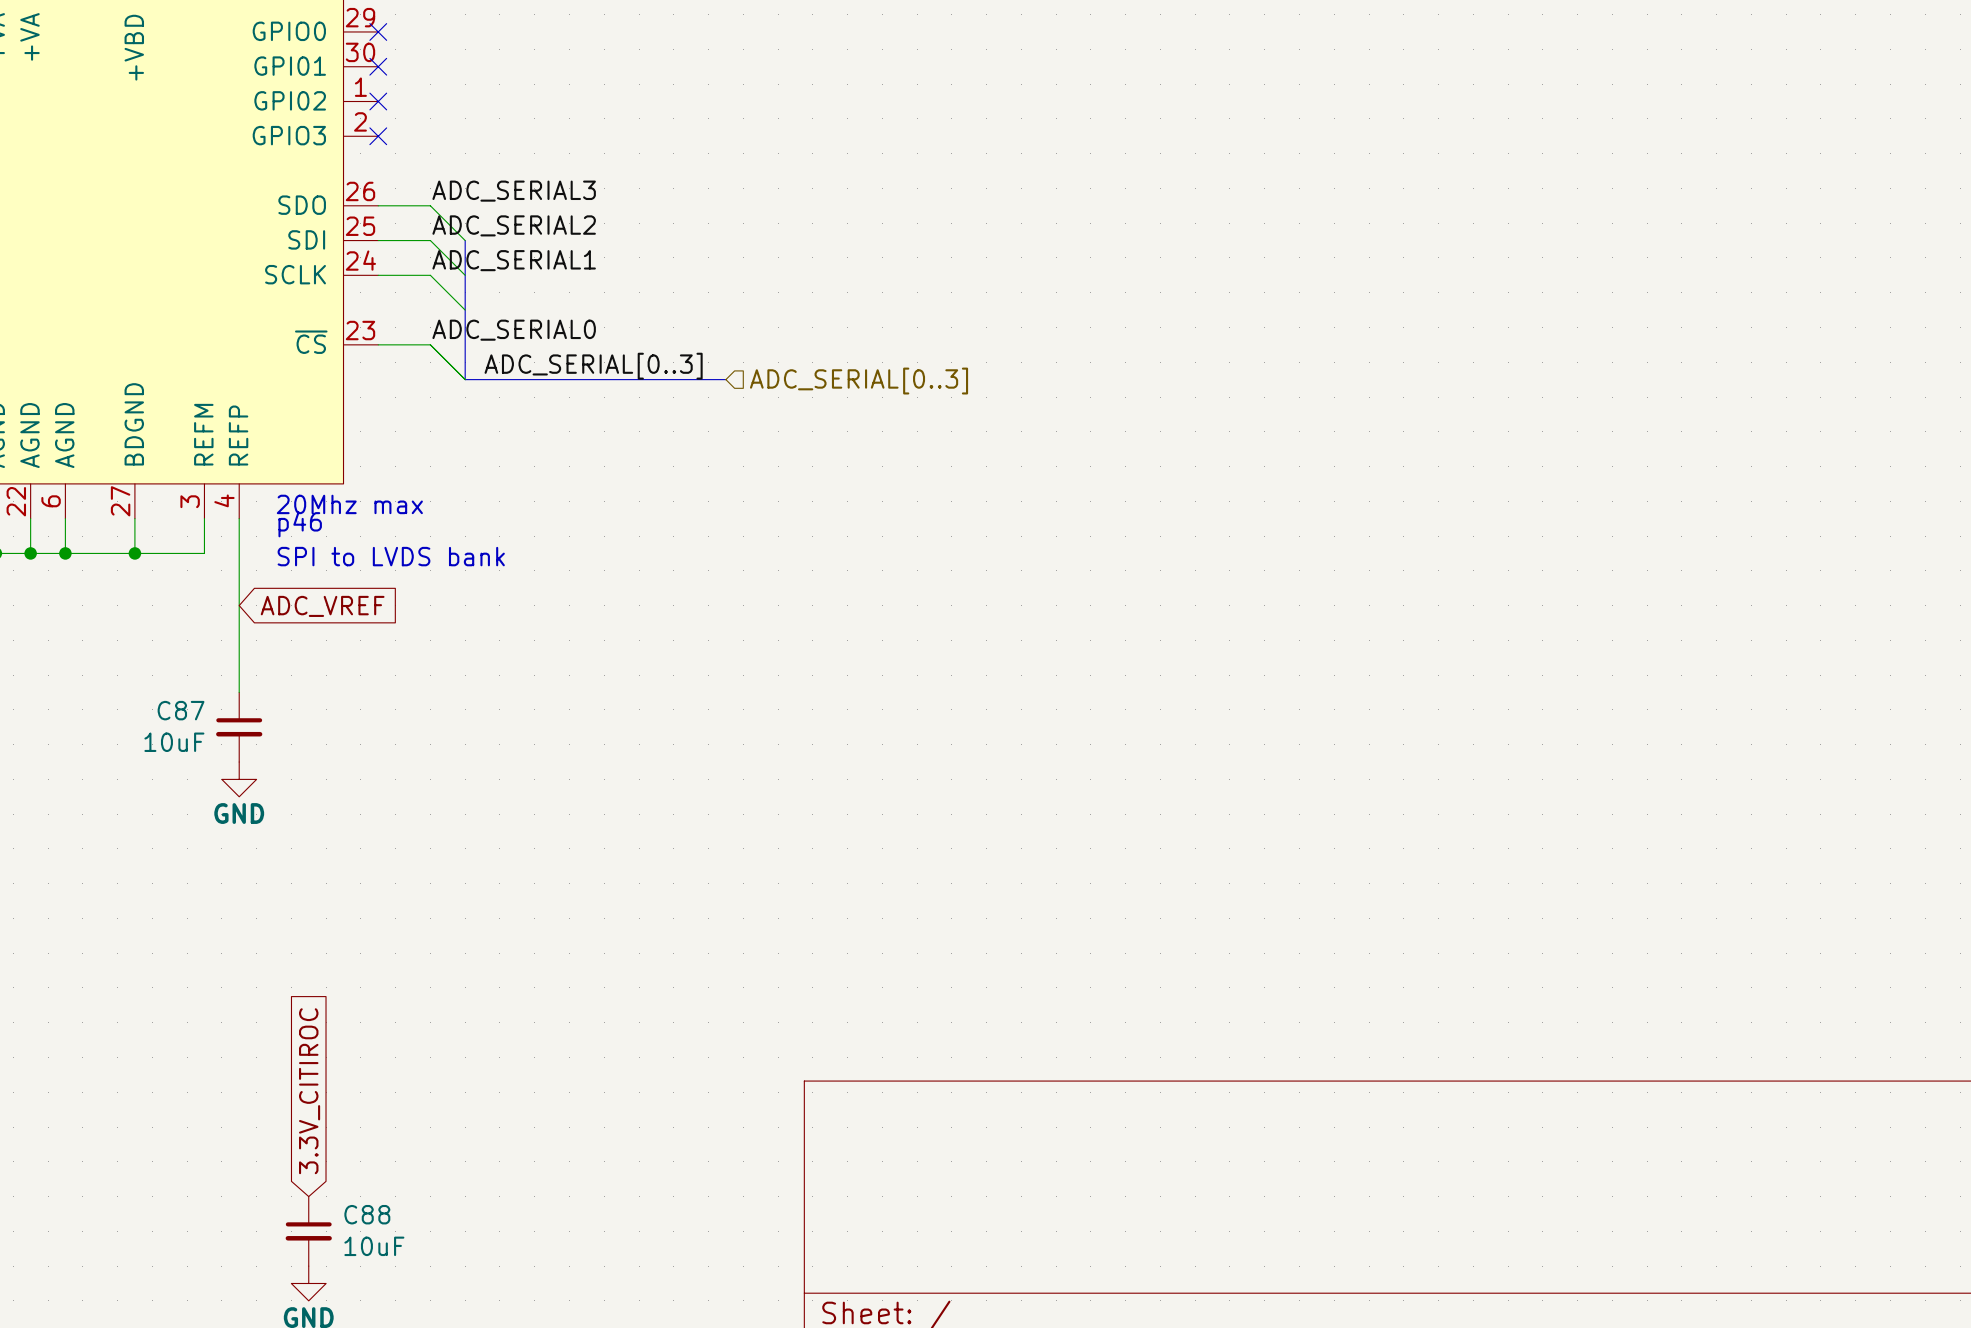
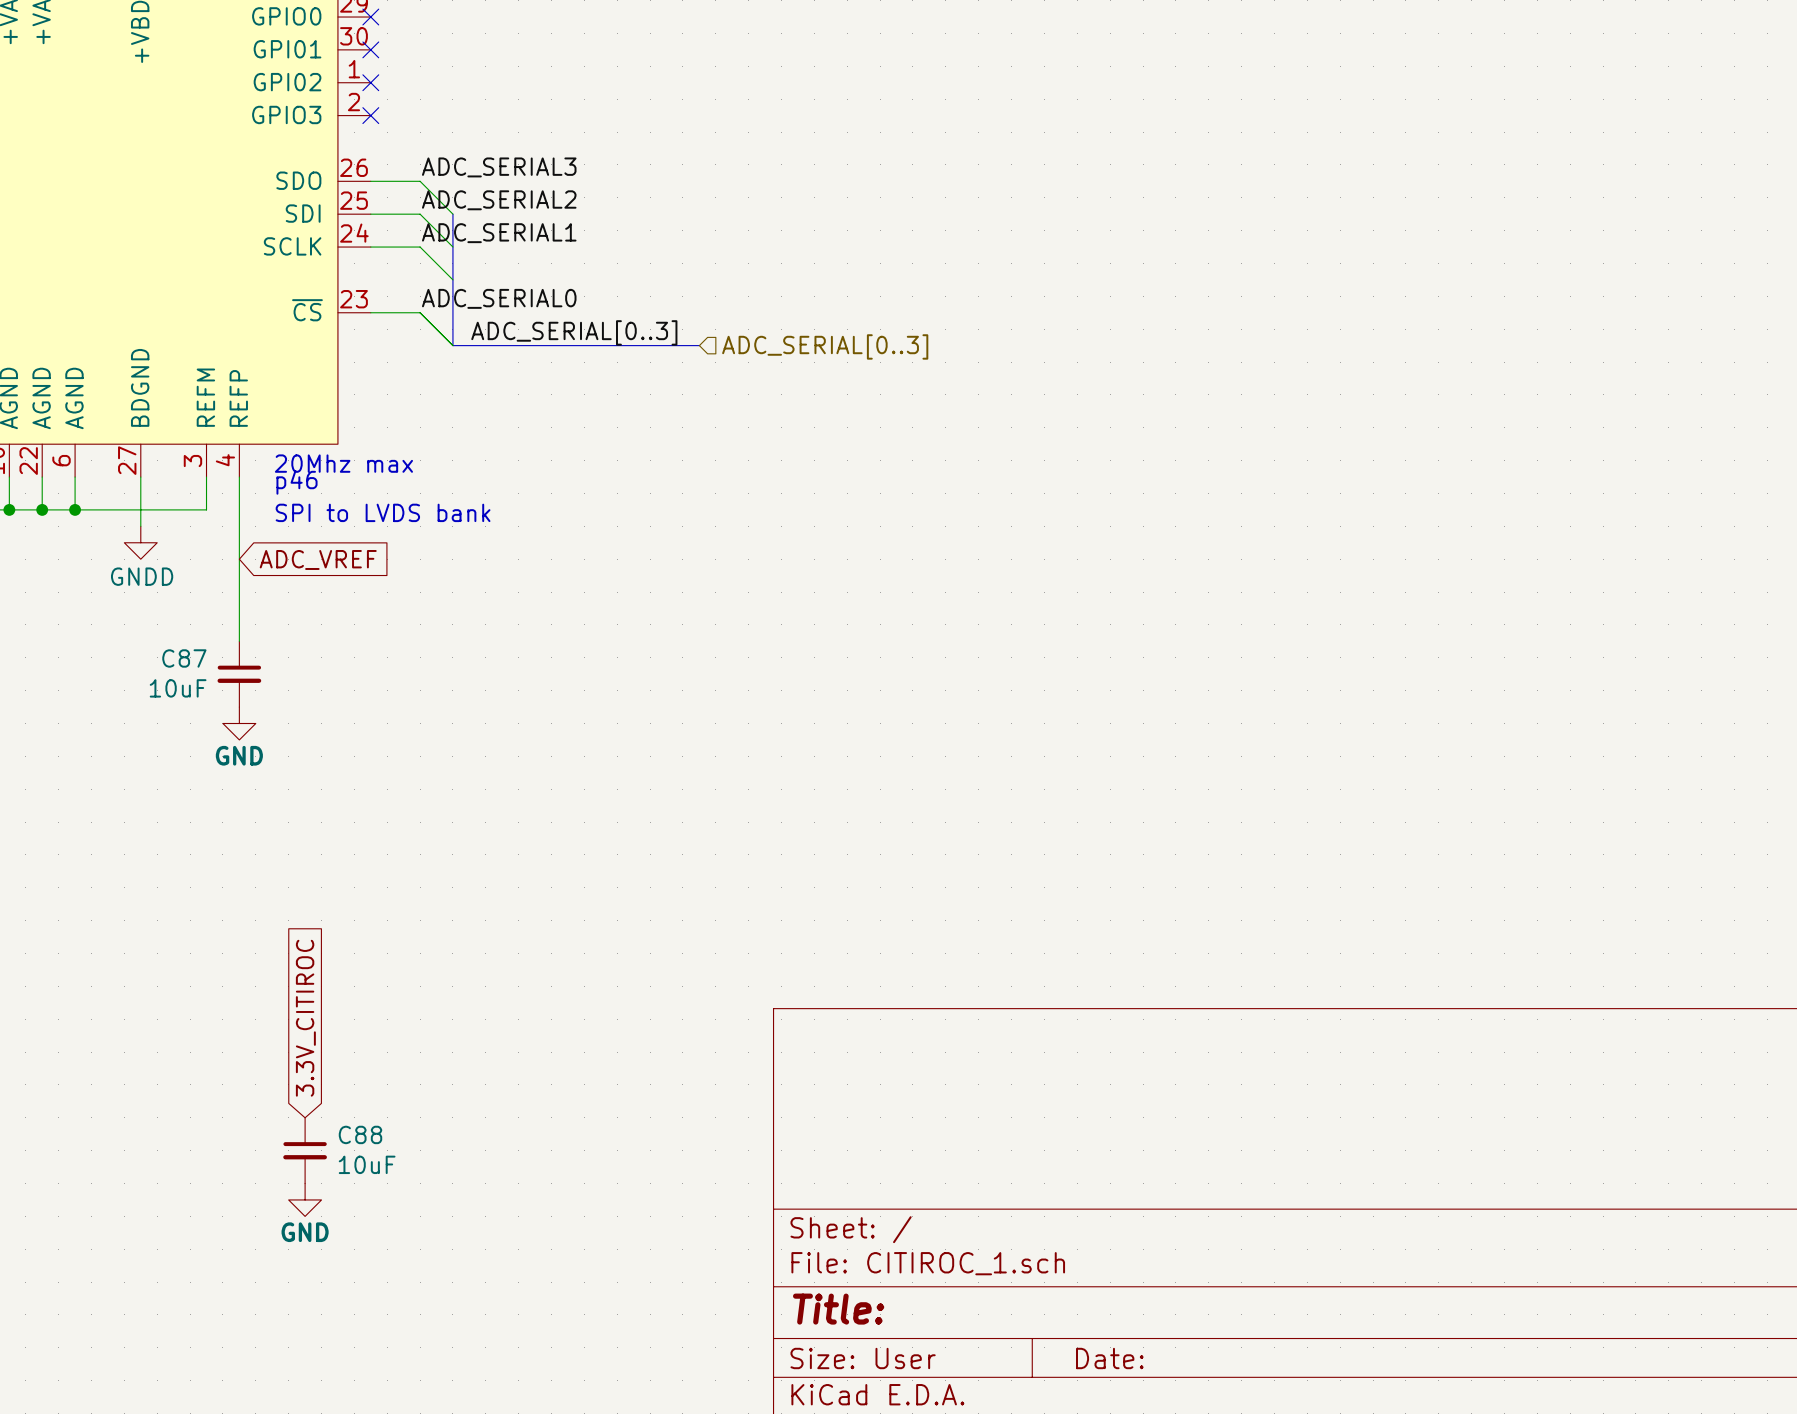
wire: none -> (140, 509) (140, 526)
junction: (134, 553) -> none
power symbol: none -> GNDD (140, 542)

